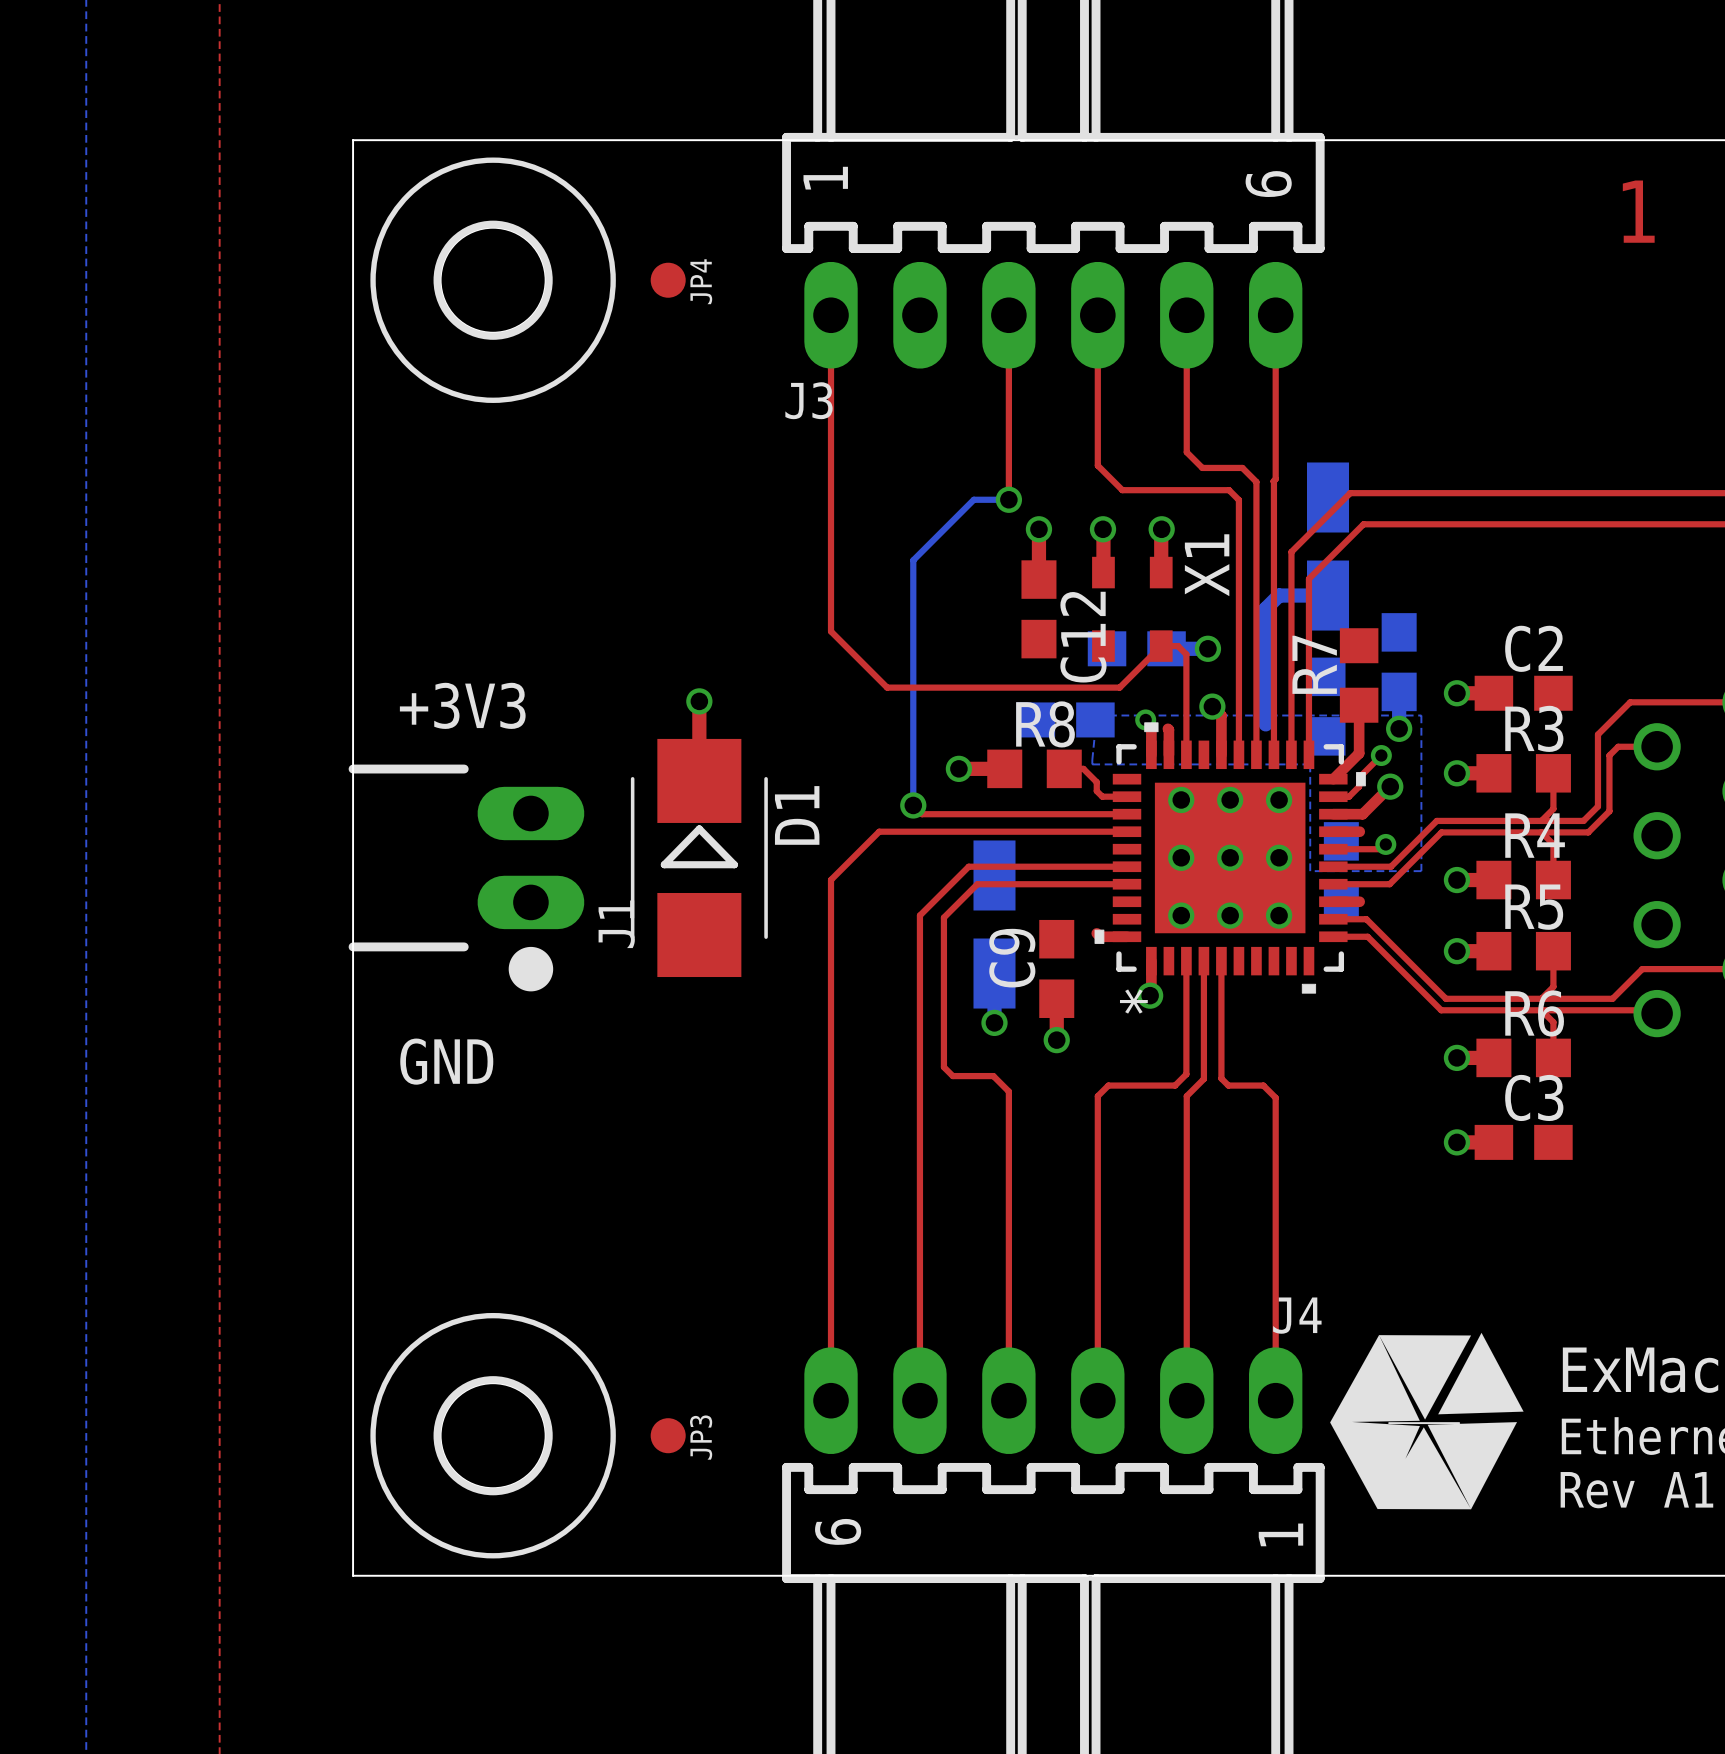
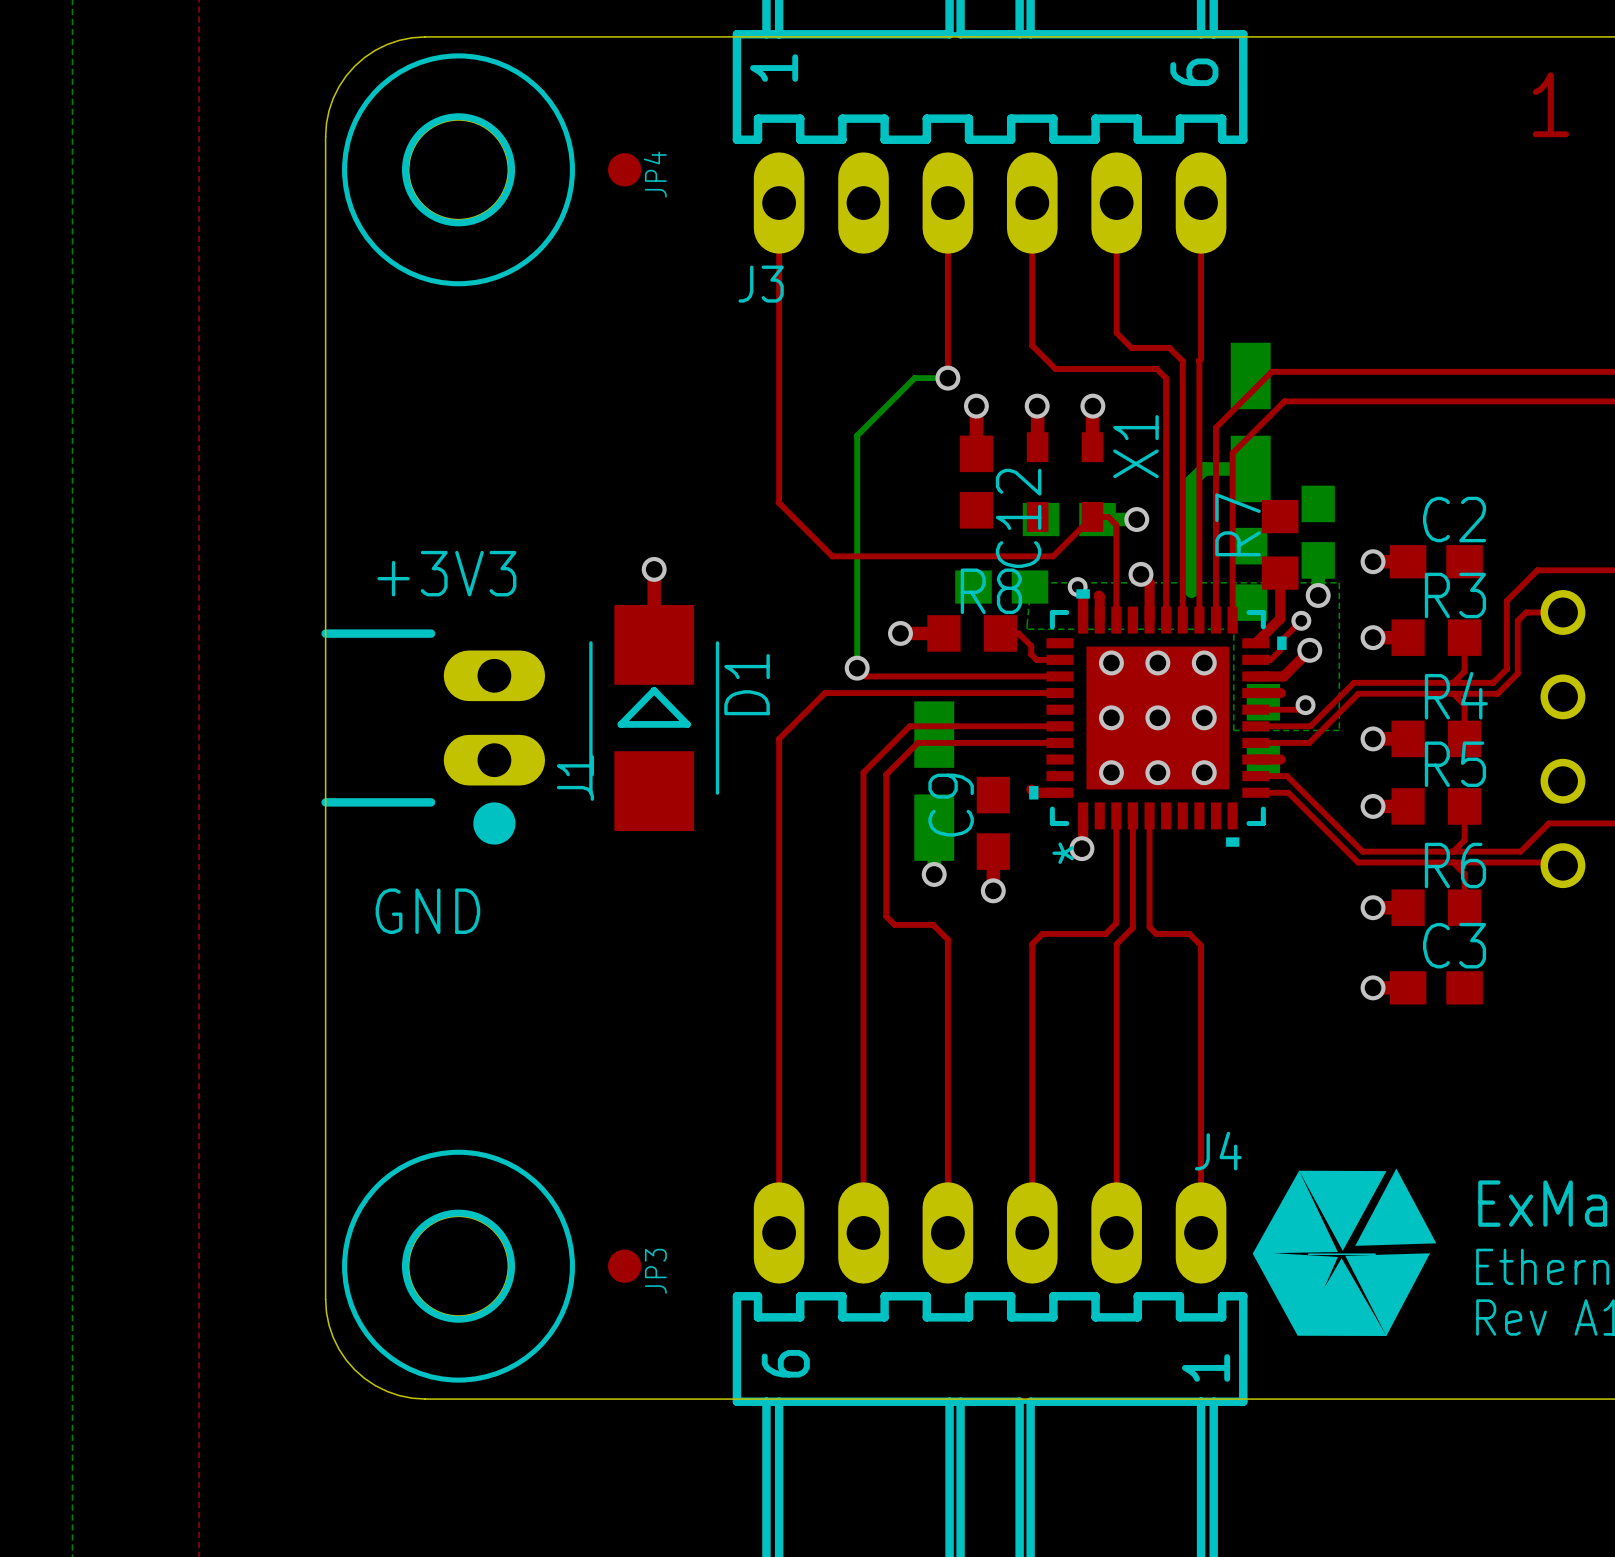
board edge: (458, 140) (353, 140) (353, 245) -> (425, 36) (399, 40) (387, 44) (364, 57) (354, 66) (346, 75) (333, 98) (329, 110) (325, 136)
board edge: (353, 1470) (353, 1575) (458, 1575) -> (325, 1299) (329, 1325) (333, 1337) (346, 1360) (354, 1369) (364, 1378) (387, 1391) (399, 1395) (425, 1399)

